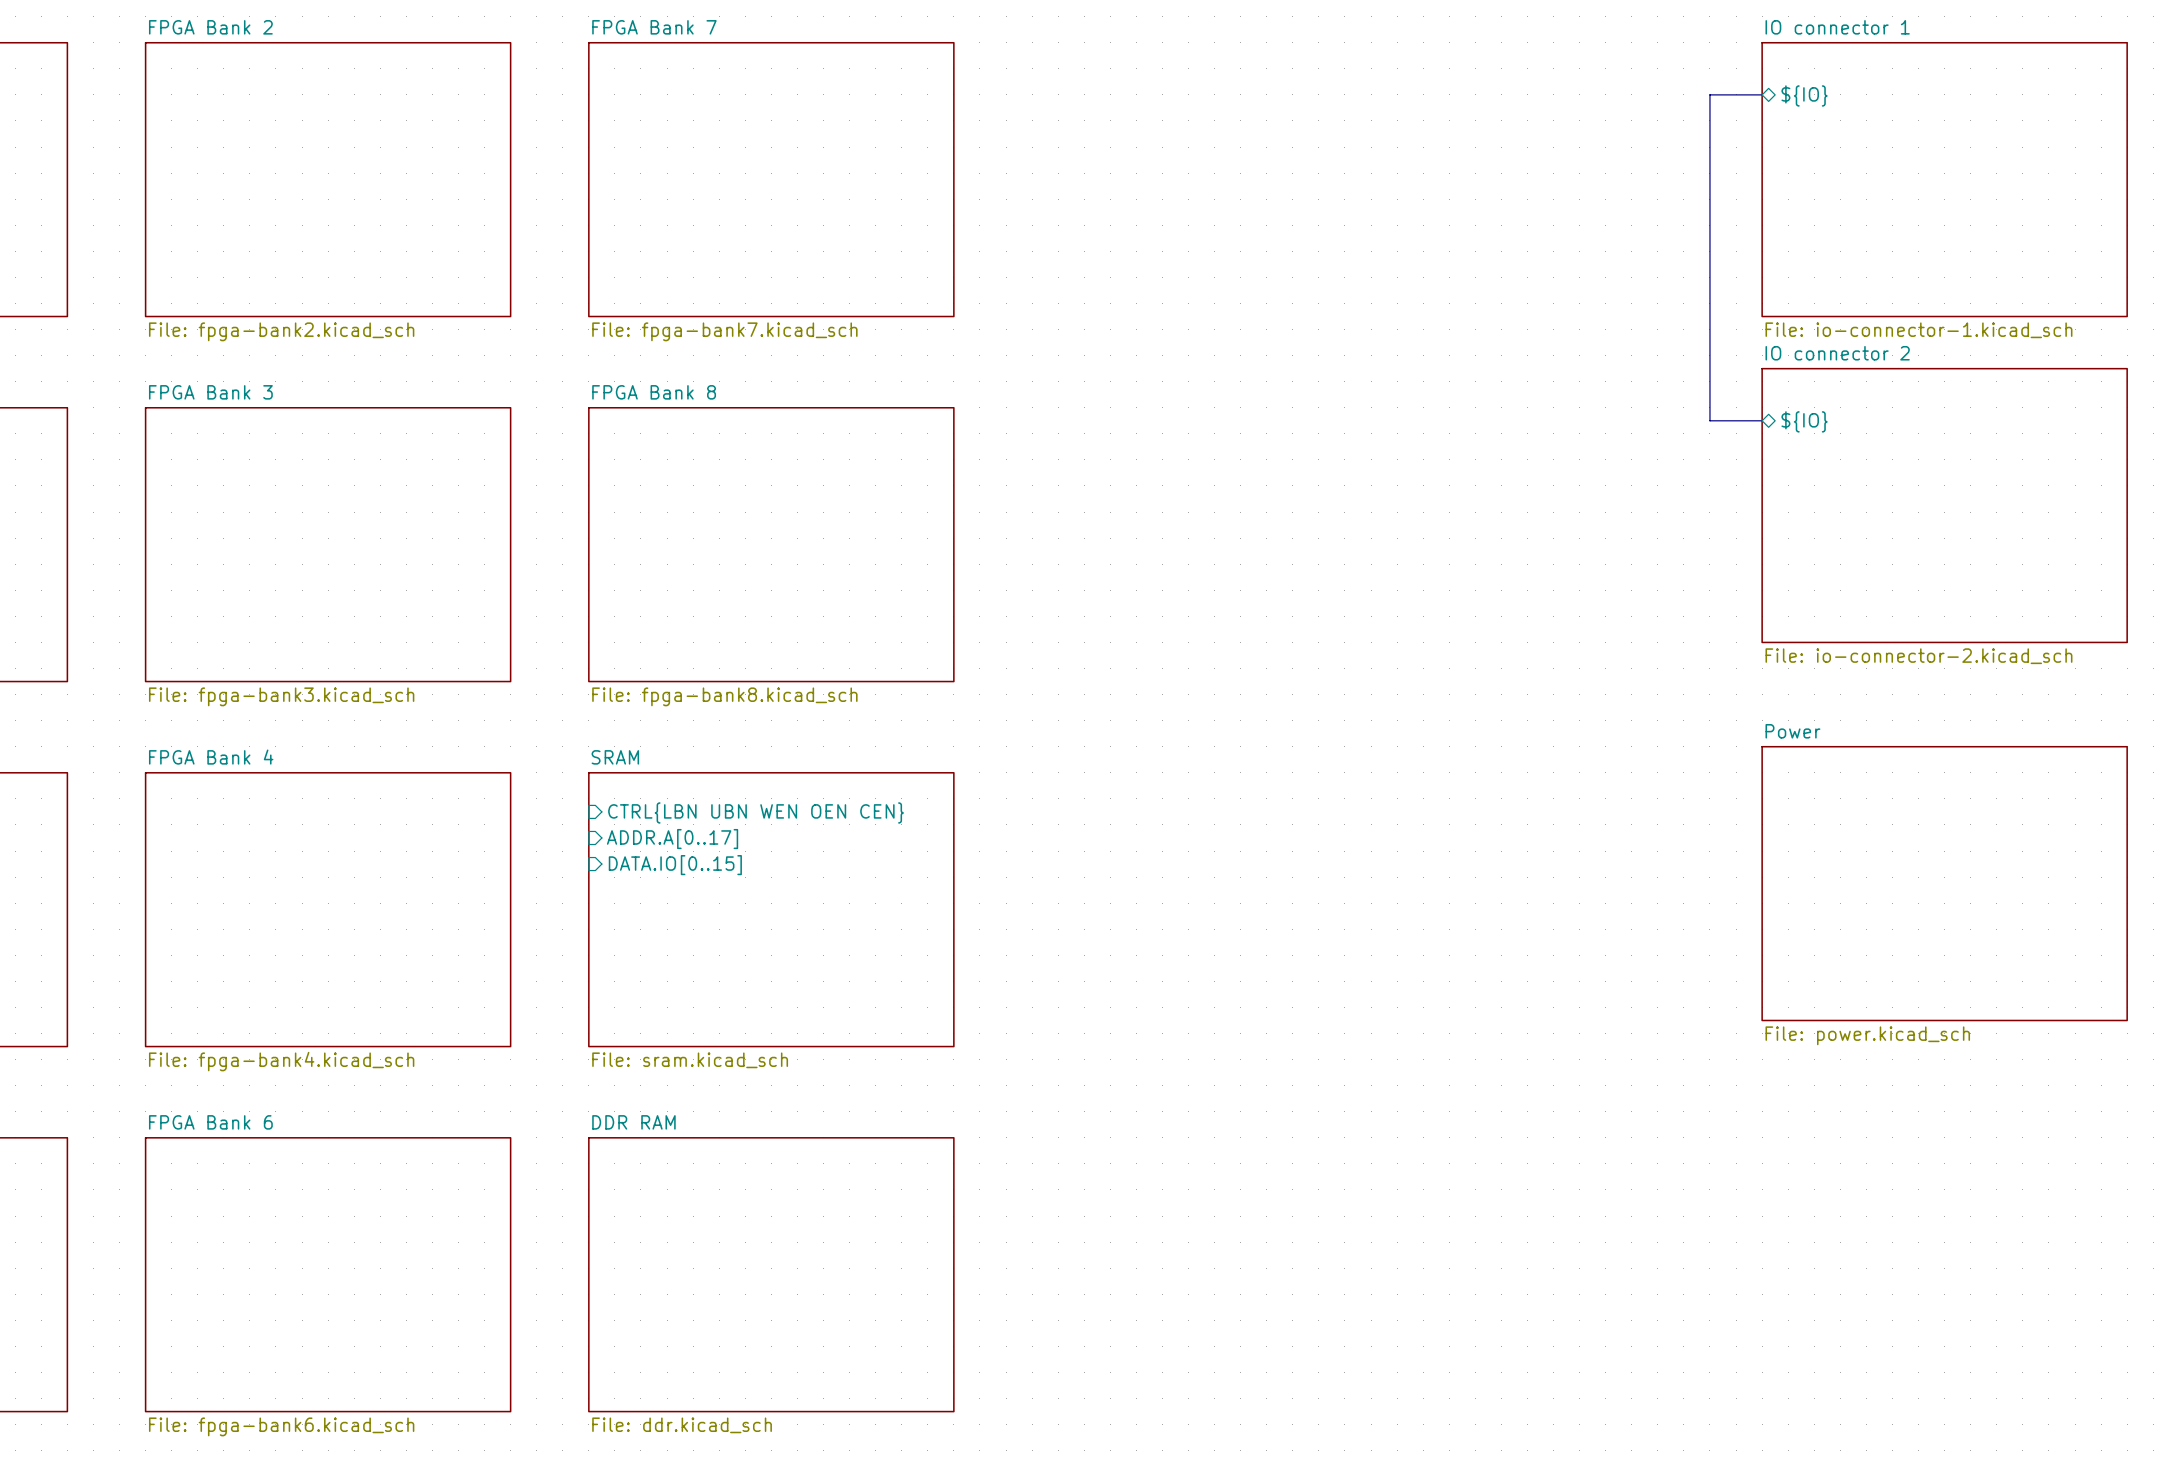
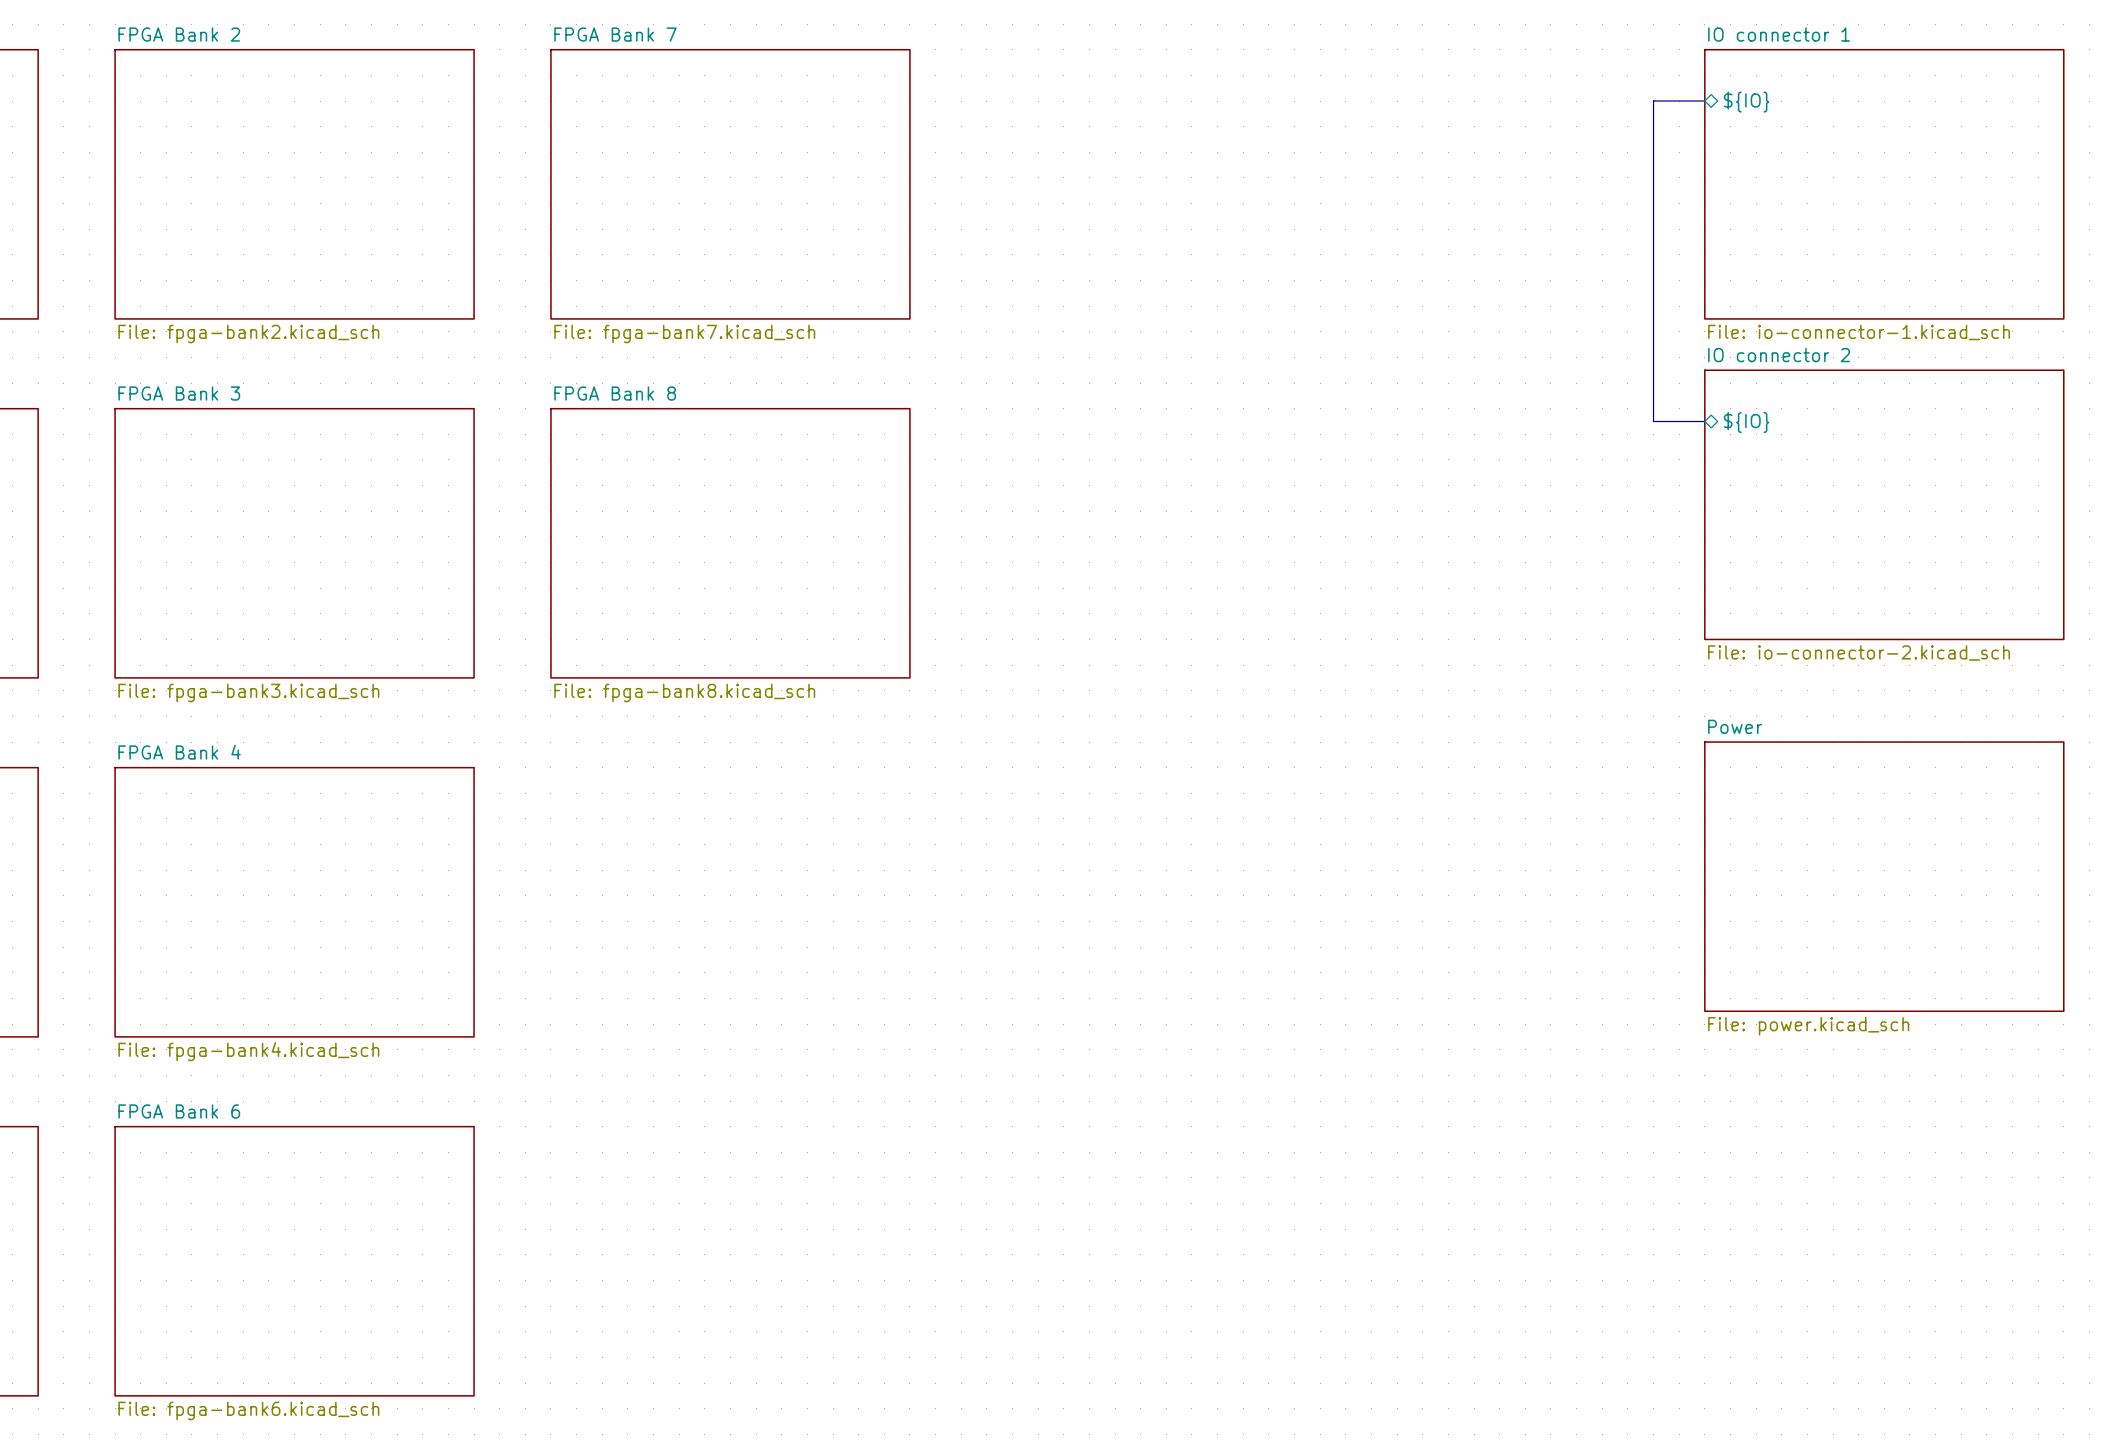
sheet pin: CTRL{LBN UBN WEN OEN CEN} (756, 812) -> none
sheet pin: ADDR.A[0..17] (672, 839) -> none
sheet pin: DATA.IO[0..15] (675, 865) -> none
sheet SRAM: File: sram.kicad_sch (771, 909) -> none
sheet DDR RAM: File: ddr.kicad_sch (771, 1274) -> none

